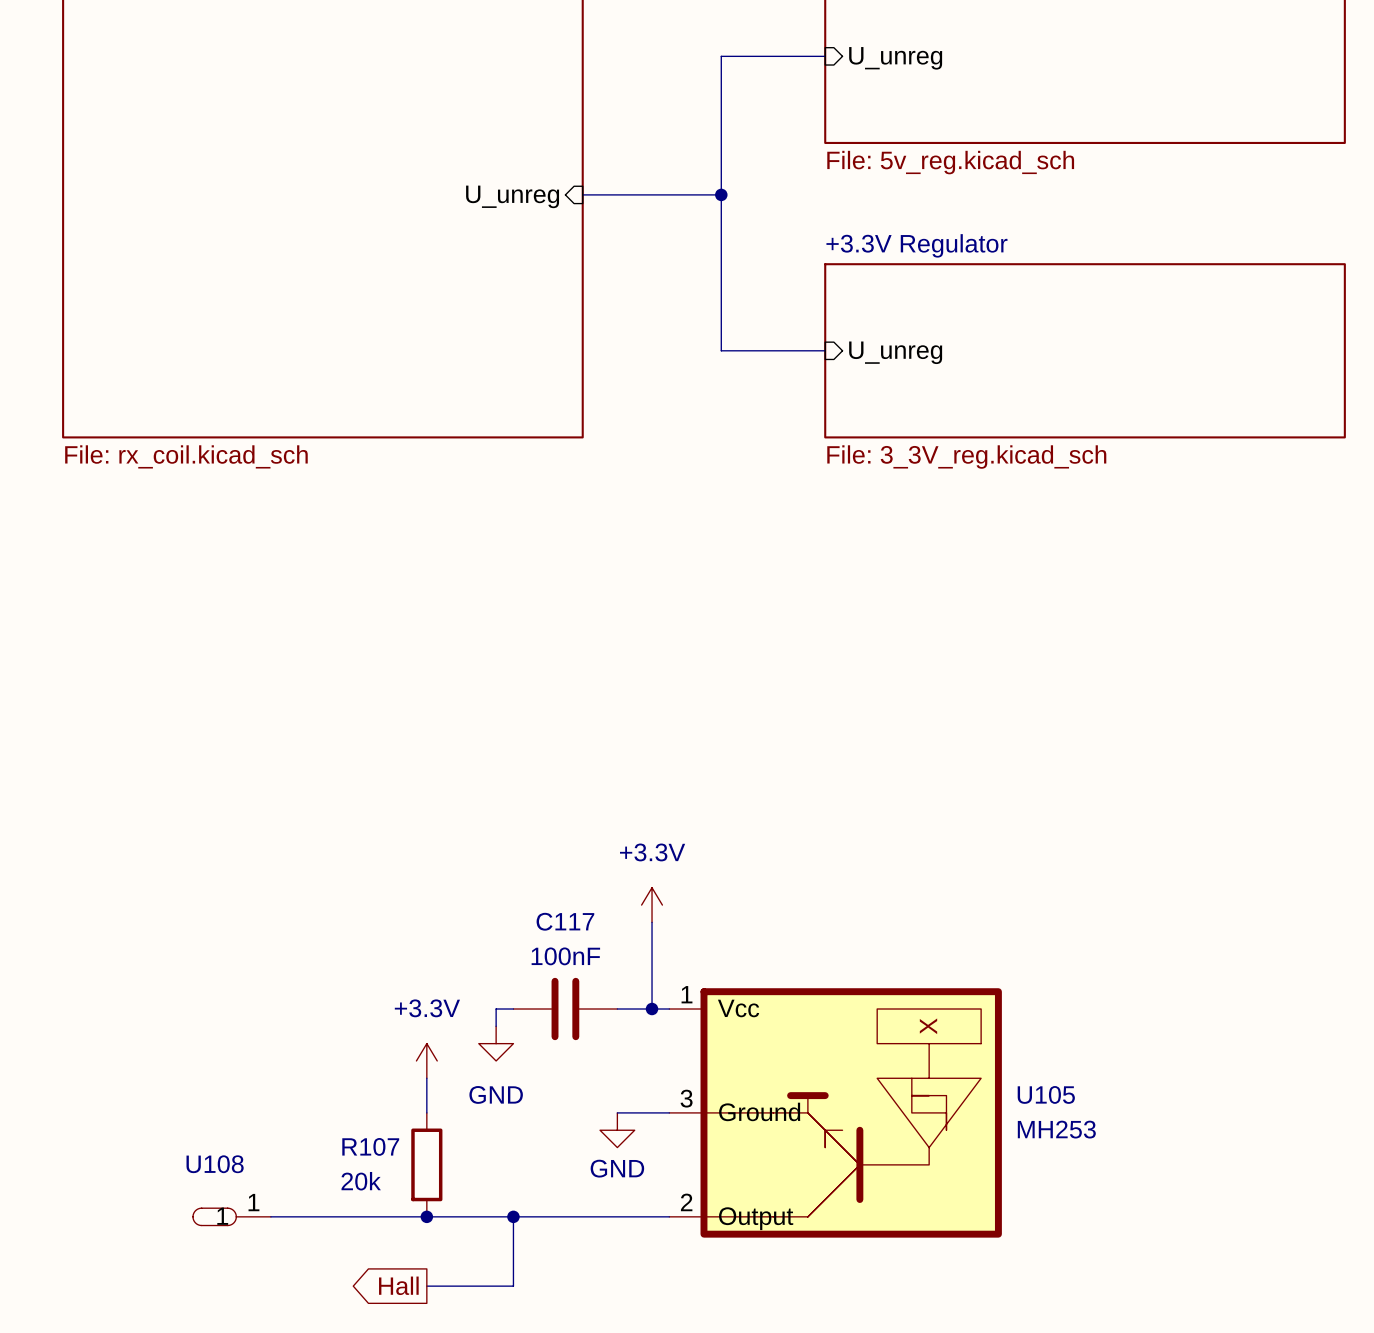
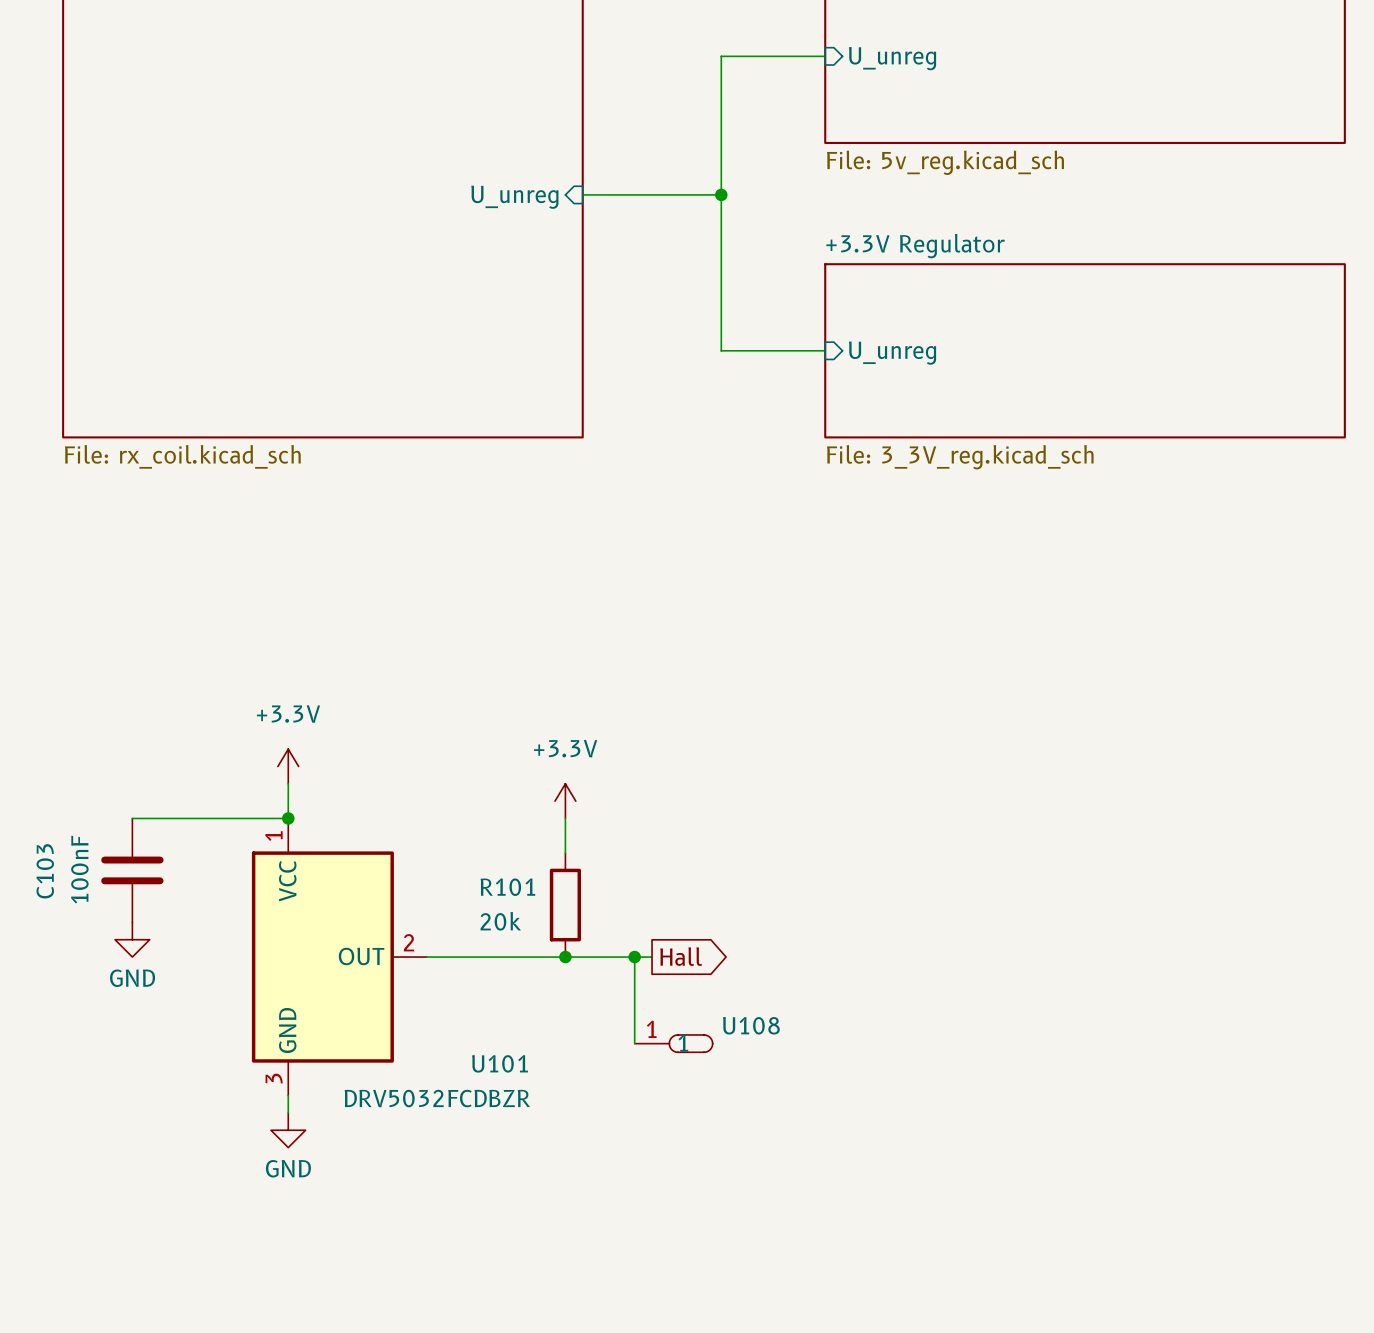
power symbol: none -> +3.3V (288, 766)
wire: none -> (288, 783) (288, 818) (132, 818)
junction: none -> (288, 818)
C103: none -> 100nF (132, 870)
R101: none -> 20k (565, 905)
power symbol position: +3.3V (652, 905) -> +3.3V (565, 801)
wire: (652, 922) (652, 1009) -> (634, 957) (634, 1043)
power symbol: none -> GND (132, 939)
global label: none -> Hall (681, 956)
U101: none -> DRV5032FCDBZR (339, 957)
wire: none -> (426, 957) (652, 957)
junction: none -> (565, 957)
junction: none -> (634, 957)
wire: (513, 1009) (496, 1009) (496, 1026) -> none
C117: 100nF (565, 1009) -> none
wire: (617, 1009) (669, 1009) -> none
junction: (652, 1009) -> none
power symbol: GND (496, 1043) -> none
power symbol: +3.3V (426, 1060) -> none
wire: (426, 1078) (426, 1112) -> (565, 818) (565, 853)
wire: none -> (288, 1095) (288, 1112)
wire: (617, 1112) (669, 1112) -> none
U105: MH253 (835, 1112) -> none
power symbol: none -> GND (288, 1130)
power symbol: GND (617, 1130) -> none
U108 name position: U108 (215, 1164) -> U108 (751, 1025)
R107: 20k (426, 1164) -> none
U108 rotation: 0° (214, 1216) -> 180° (690, 1043)
U108 position: (231, 1216) -> (673, 1043)
wire: (270, 1216) (669, 1216) -> none
junction: (426, 1216) -> none
wire: (513, 1216) (513, 1286) (426, 1286) -> none
junction: (513, 1216) -> none
global label: Hall (398, 1285) -> none

